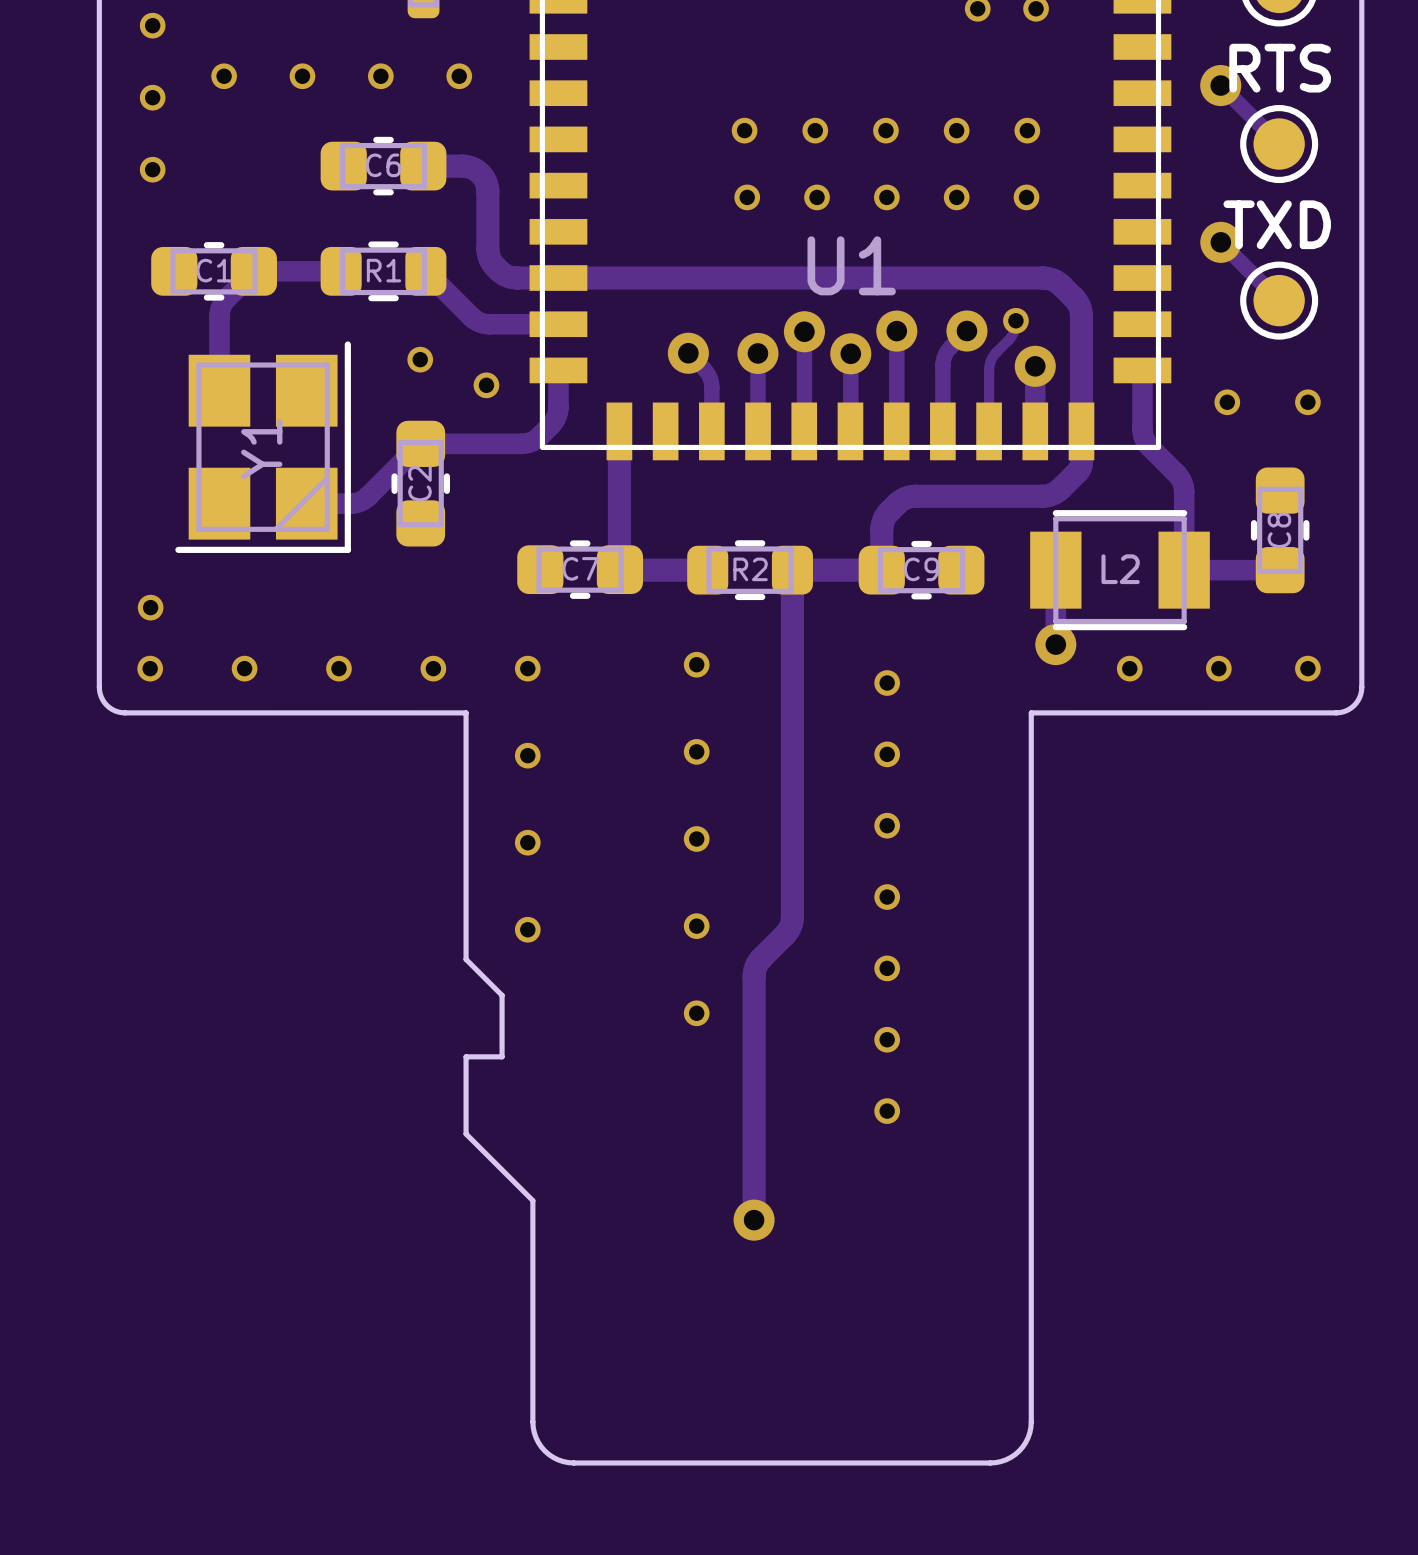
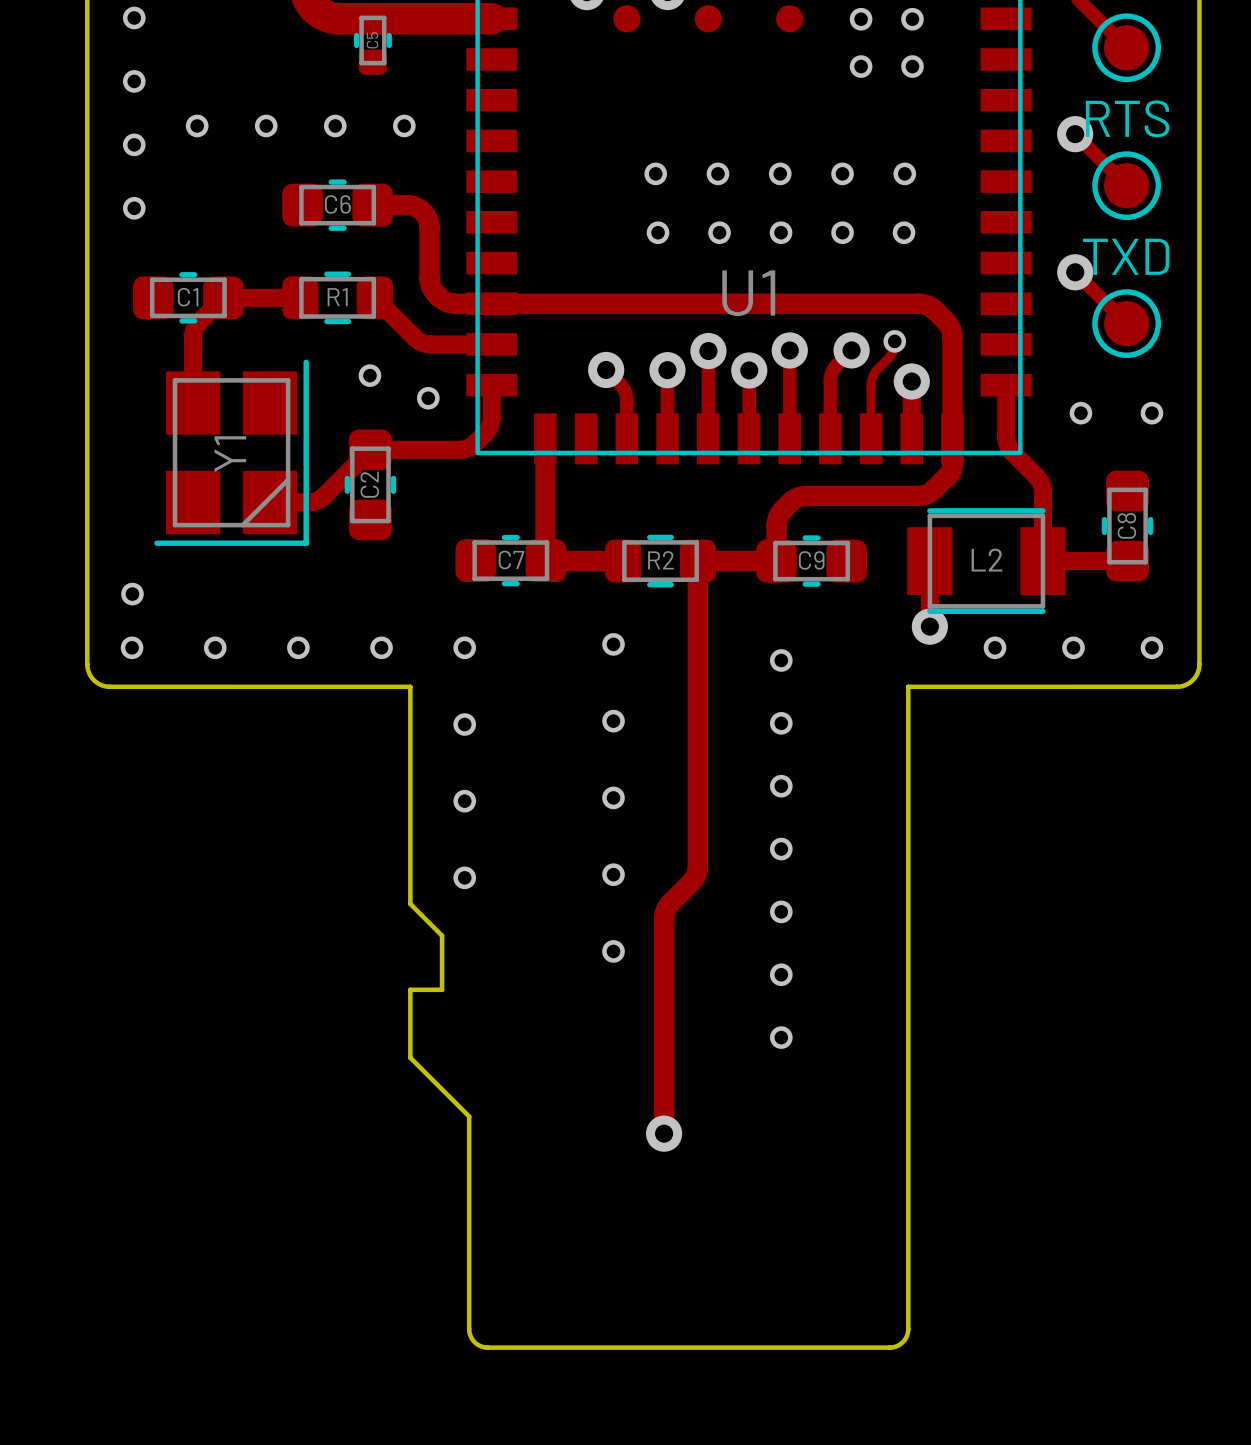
part footprint: [463, 710, 1034, 1466] -> [408, 684, 911, 1350]

